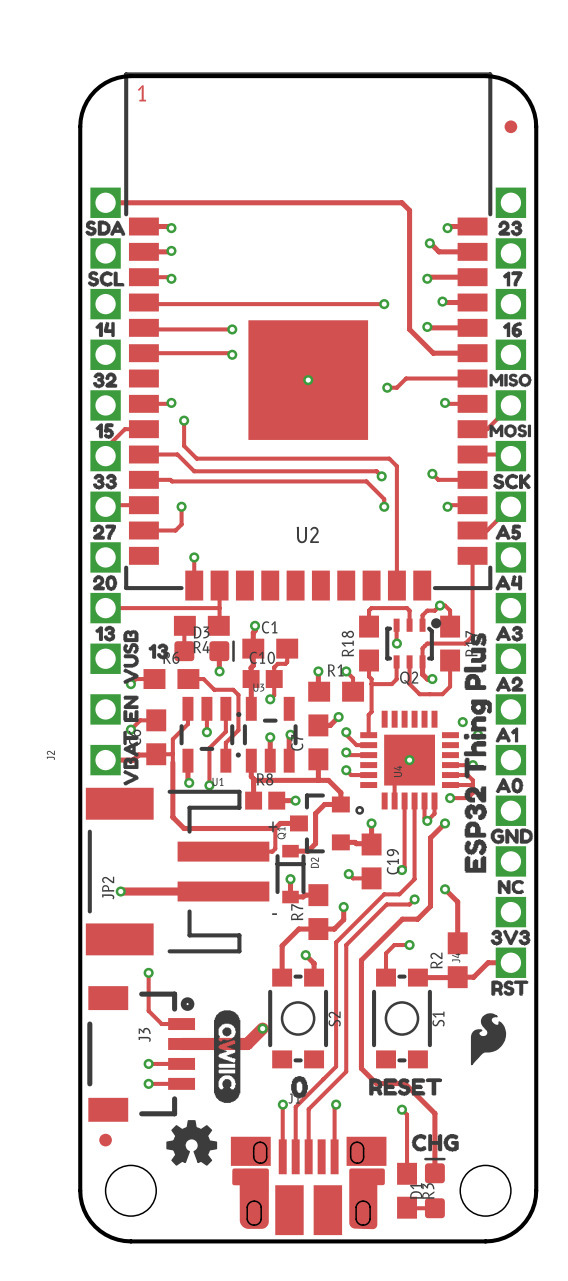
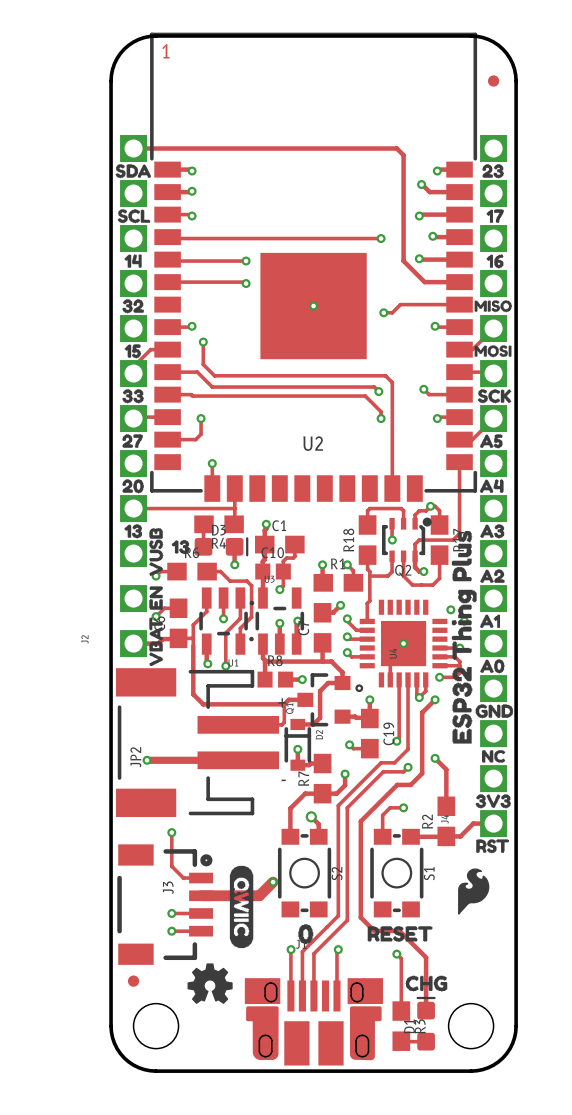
via: (305, 955) -> none
part: none -> (311, 816)

